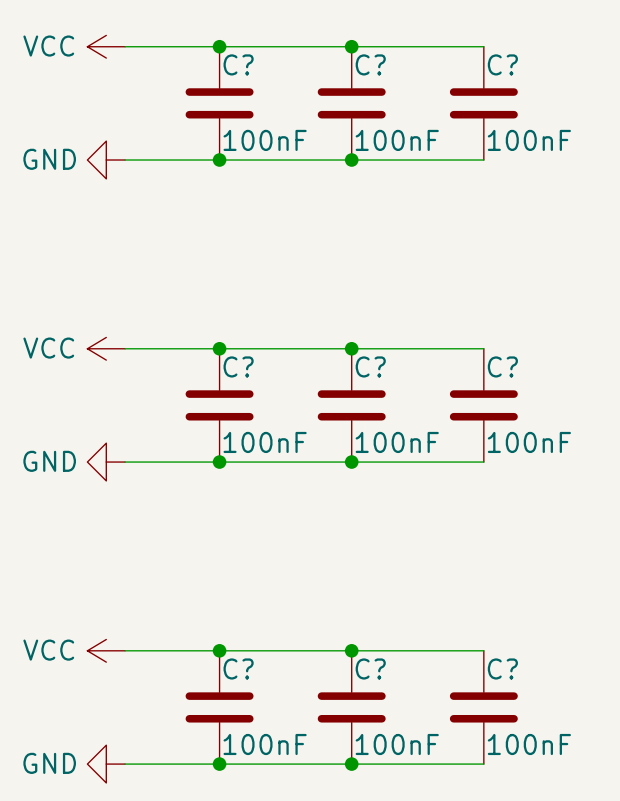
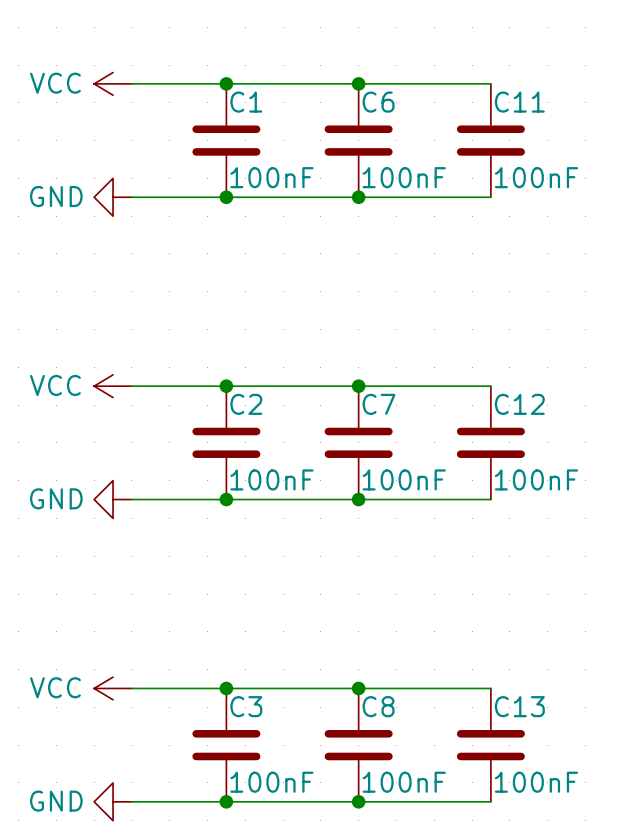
C? name: C? (238, 64) -> C1 (246, 102)
C? name: C? (370, 64) -> C6 (378, 102)
C? name: C? (502, 64) -> C11 (519, 102)
C? name: C? (238, 366) -> C2 (246, 404)
C? name: C? (370, 366) -> C7 (379, 404)
C? name: C? (502, 366) -> C12 (519, 404)
C? name: C? (238, 668) -> C3 (246, 706)
C? name: C? (370, 668) -> C8 (378, 706)
C? name: C? (502, 668) -> C13 (519, 706)

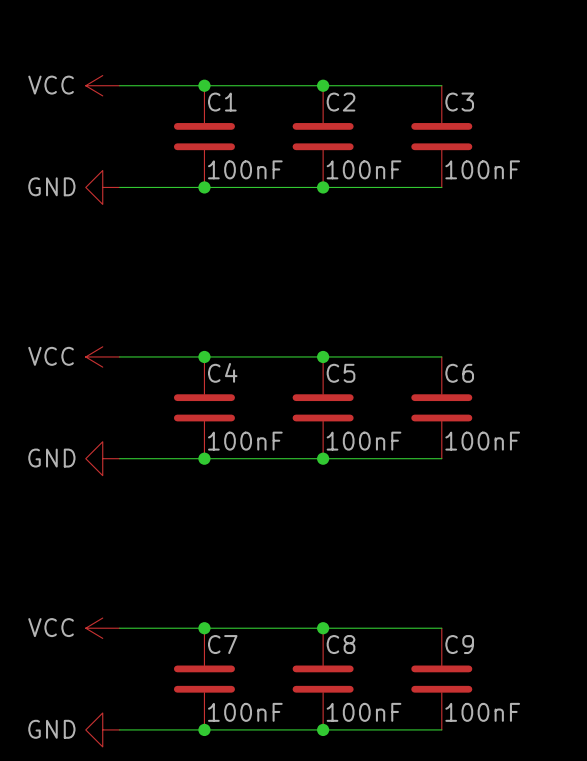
C6 name: C6 (378, 102) -> C2 (341, 102)
C11 name: C11 (519, 102) -> C3 (459, 102)
C2 name: C2 (246, 404) -> C4 (222, 372)
C7 name: C7 (379, 404) -> C5 (341, 373)
C12 name: C12 (519, 404) -> C6 (459, 373)
C3 name: C3 (246, 706) -> C7 (222, 644)
C13 name: C13 (519, 706) -> C9 (459, 644)

